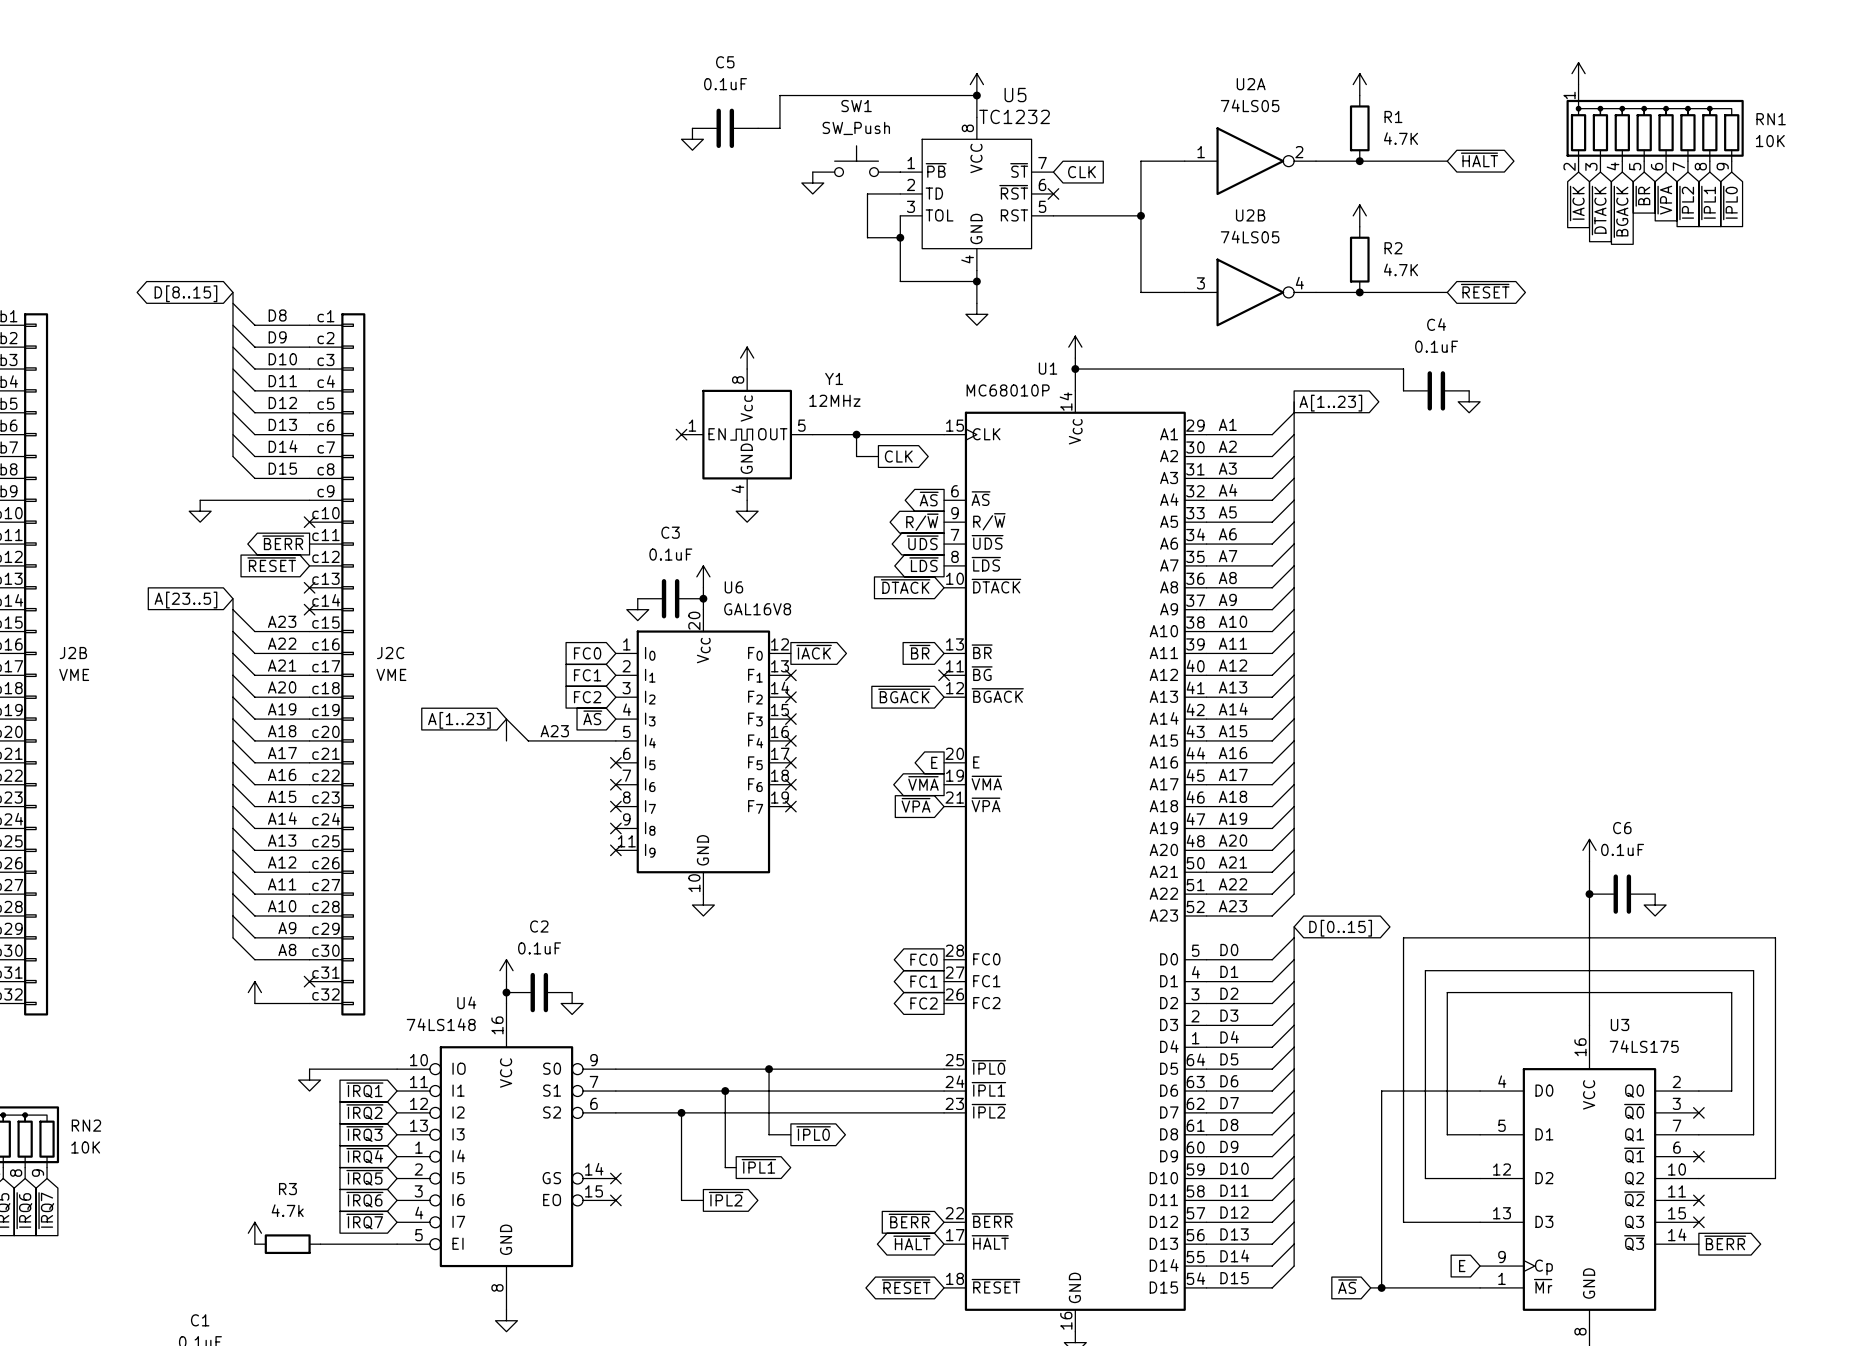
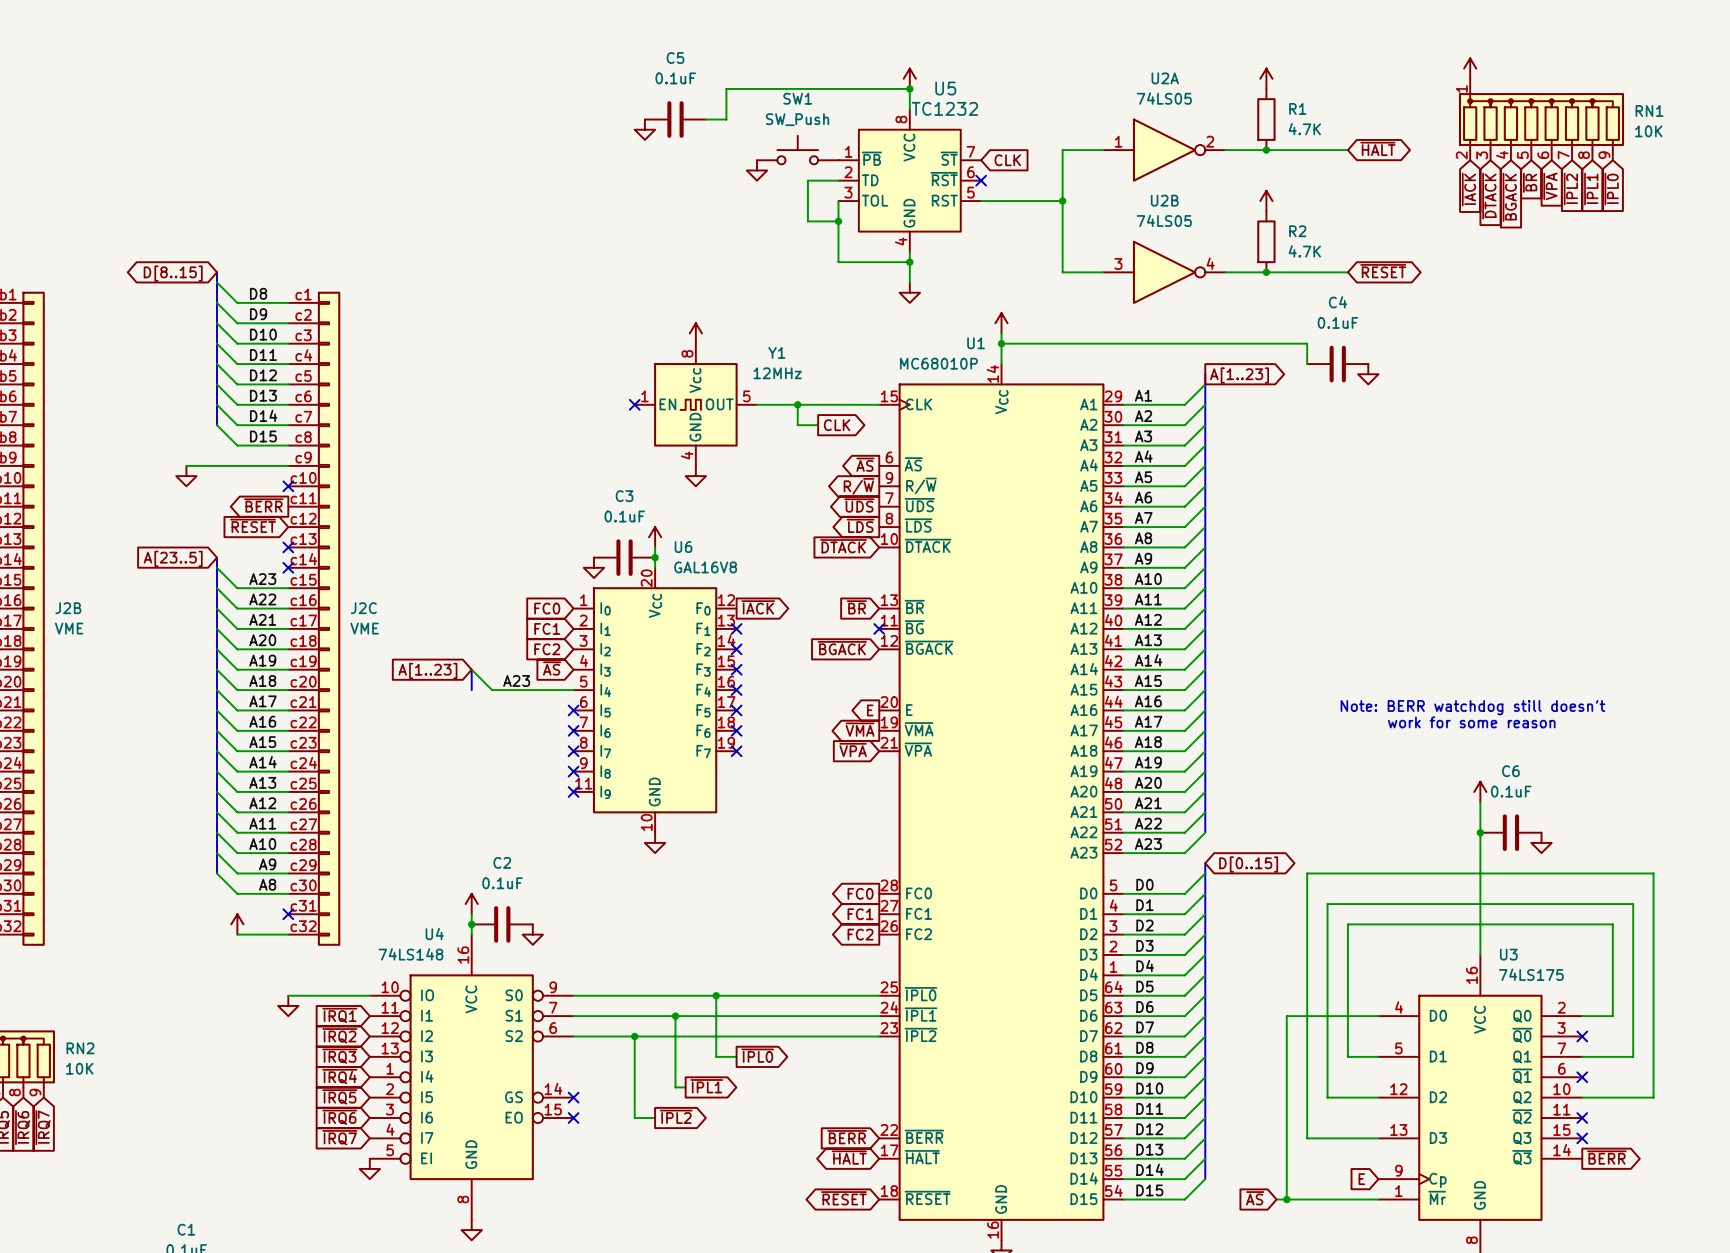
text: none -> Note: BERR watchdog still doesn't (1472, 707)
text: none -> work for some reason (1471, 722)
power symbol: (254, 1233) -> none
R3: 4.7k (287, 1244) -> none
wire: (320, 1244) (397, 1244) -> none
power symbol: none -> (369, 1168)

